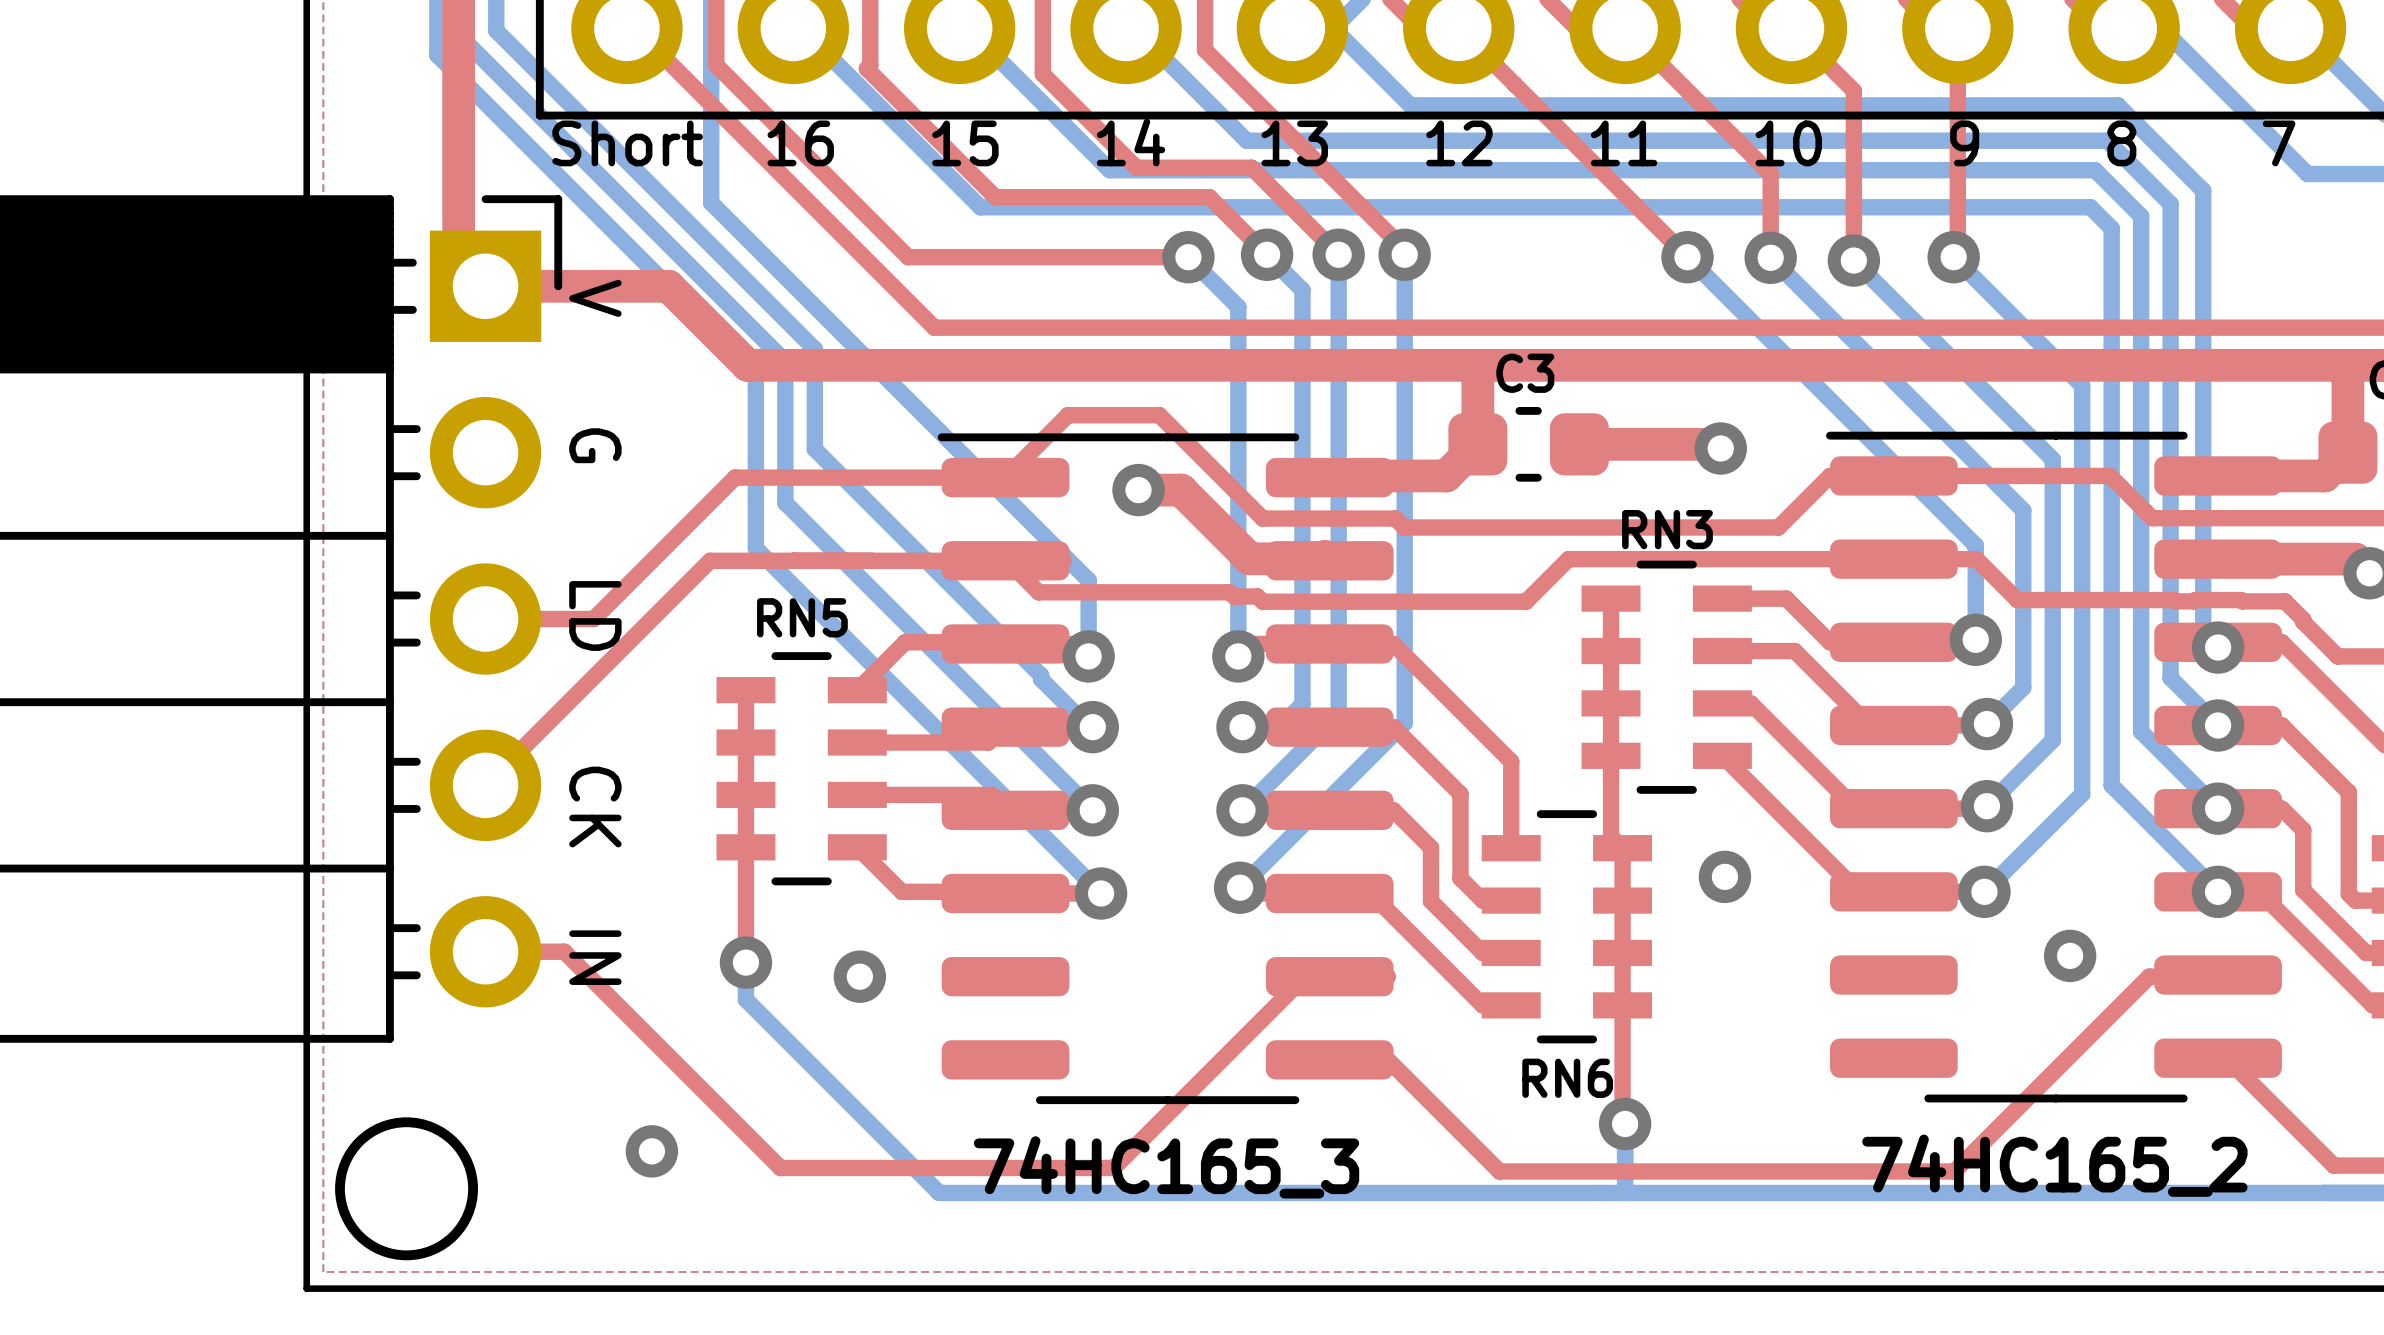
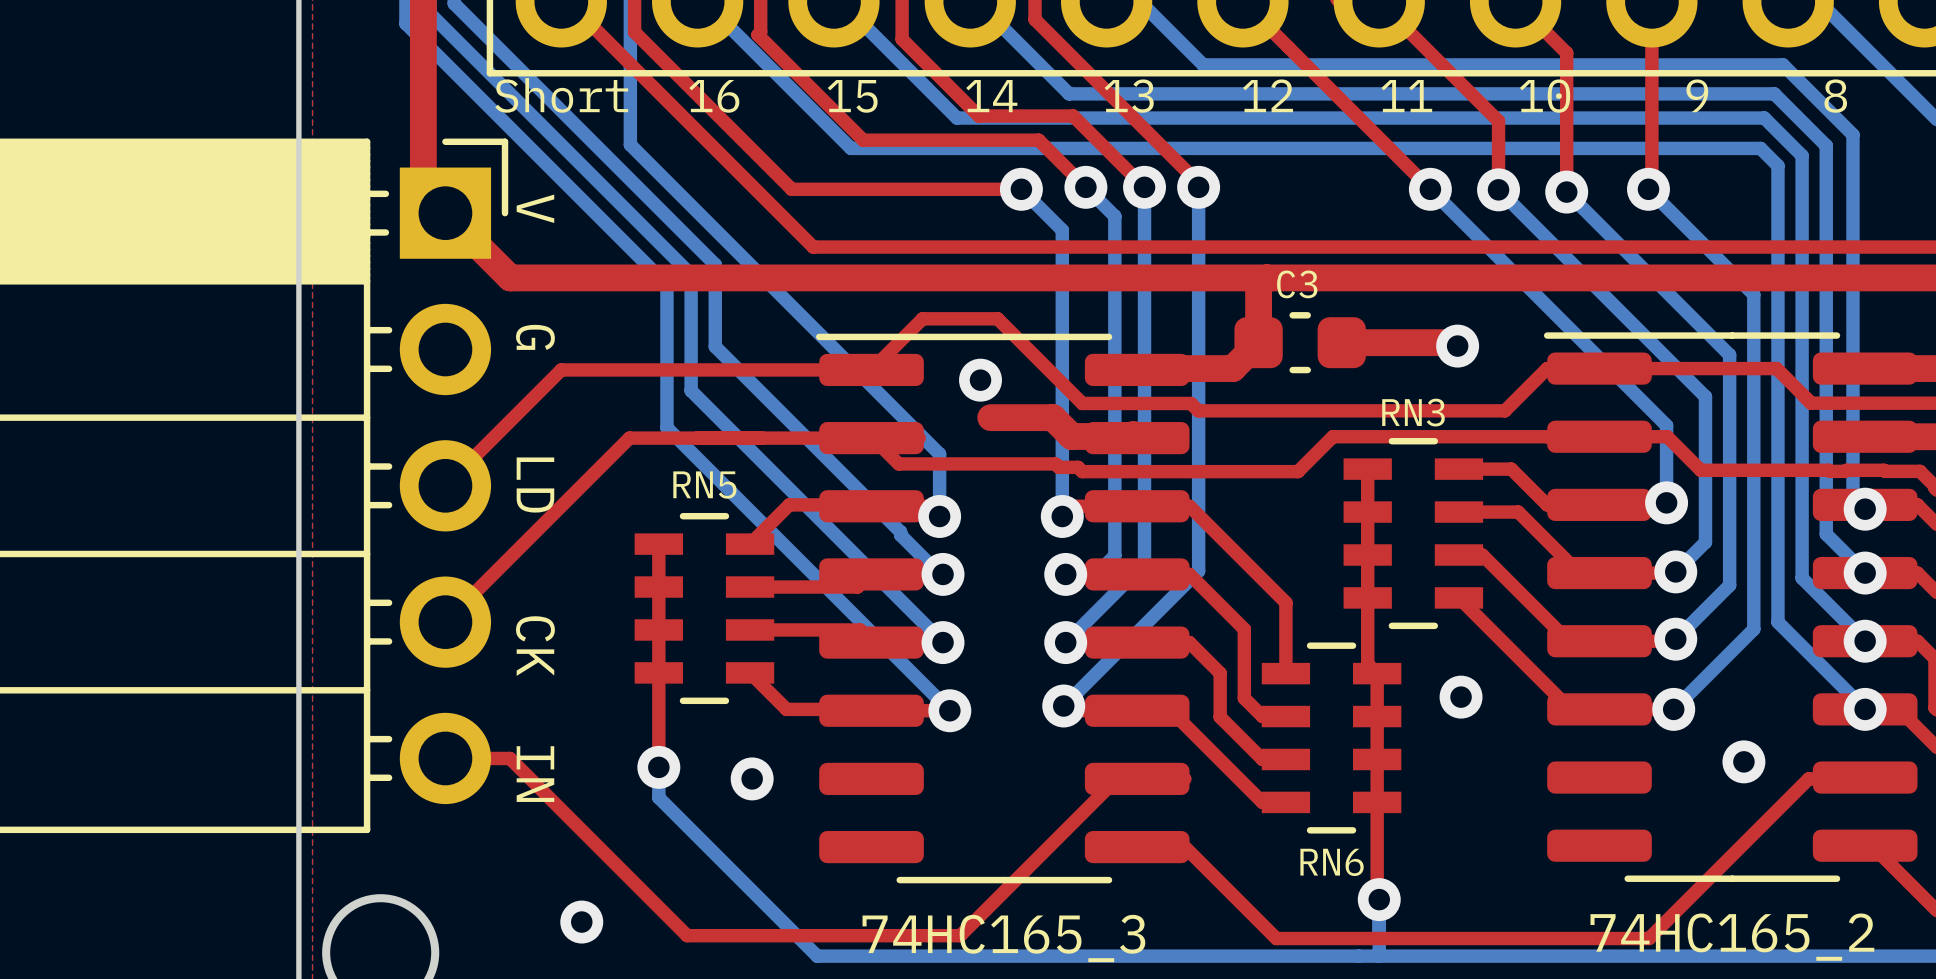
top track: (485, 286) (668, 286) (747, 365) -> (445, 213) (510, 277) (660, 277)
top track: (735, 477) (593, 619) (485, 619) -> (649, 369) (561, 369) (445, 485)
top track: (1138, 490) (1181, 490) (1226, 535) -> (990, 417) (1052, 417)

